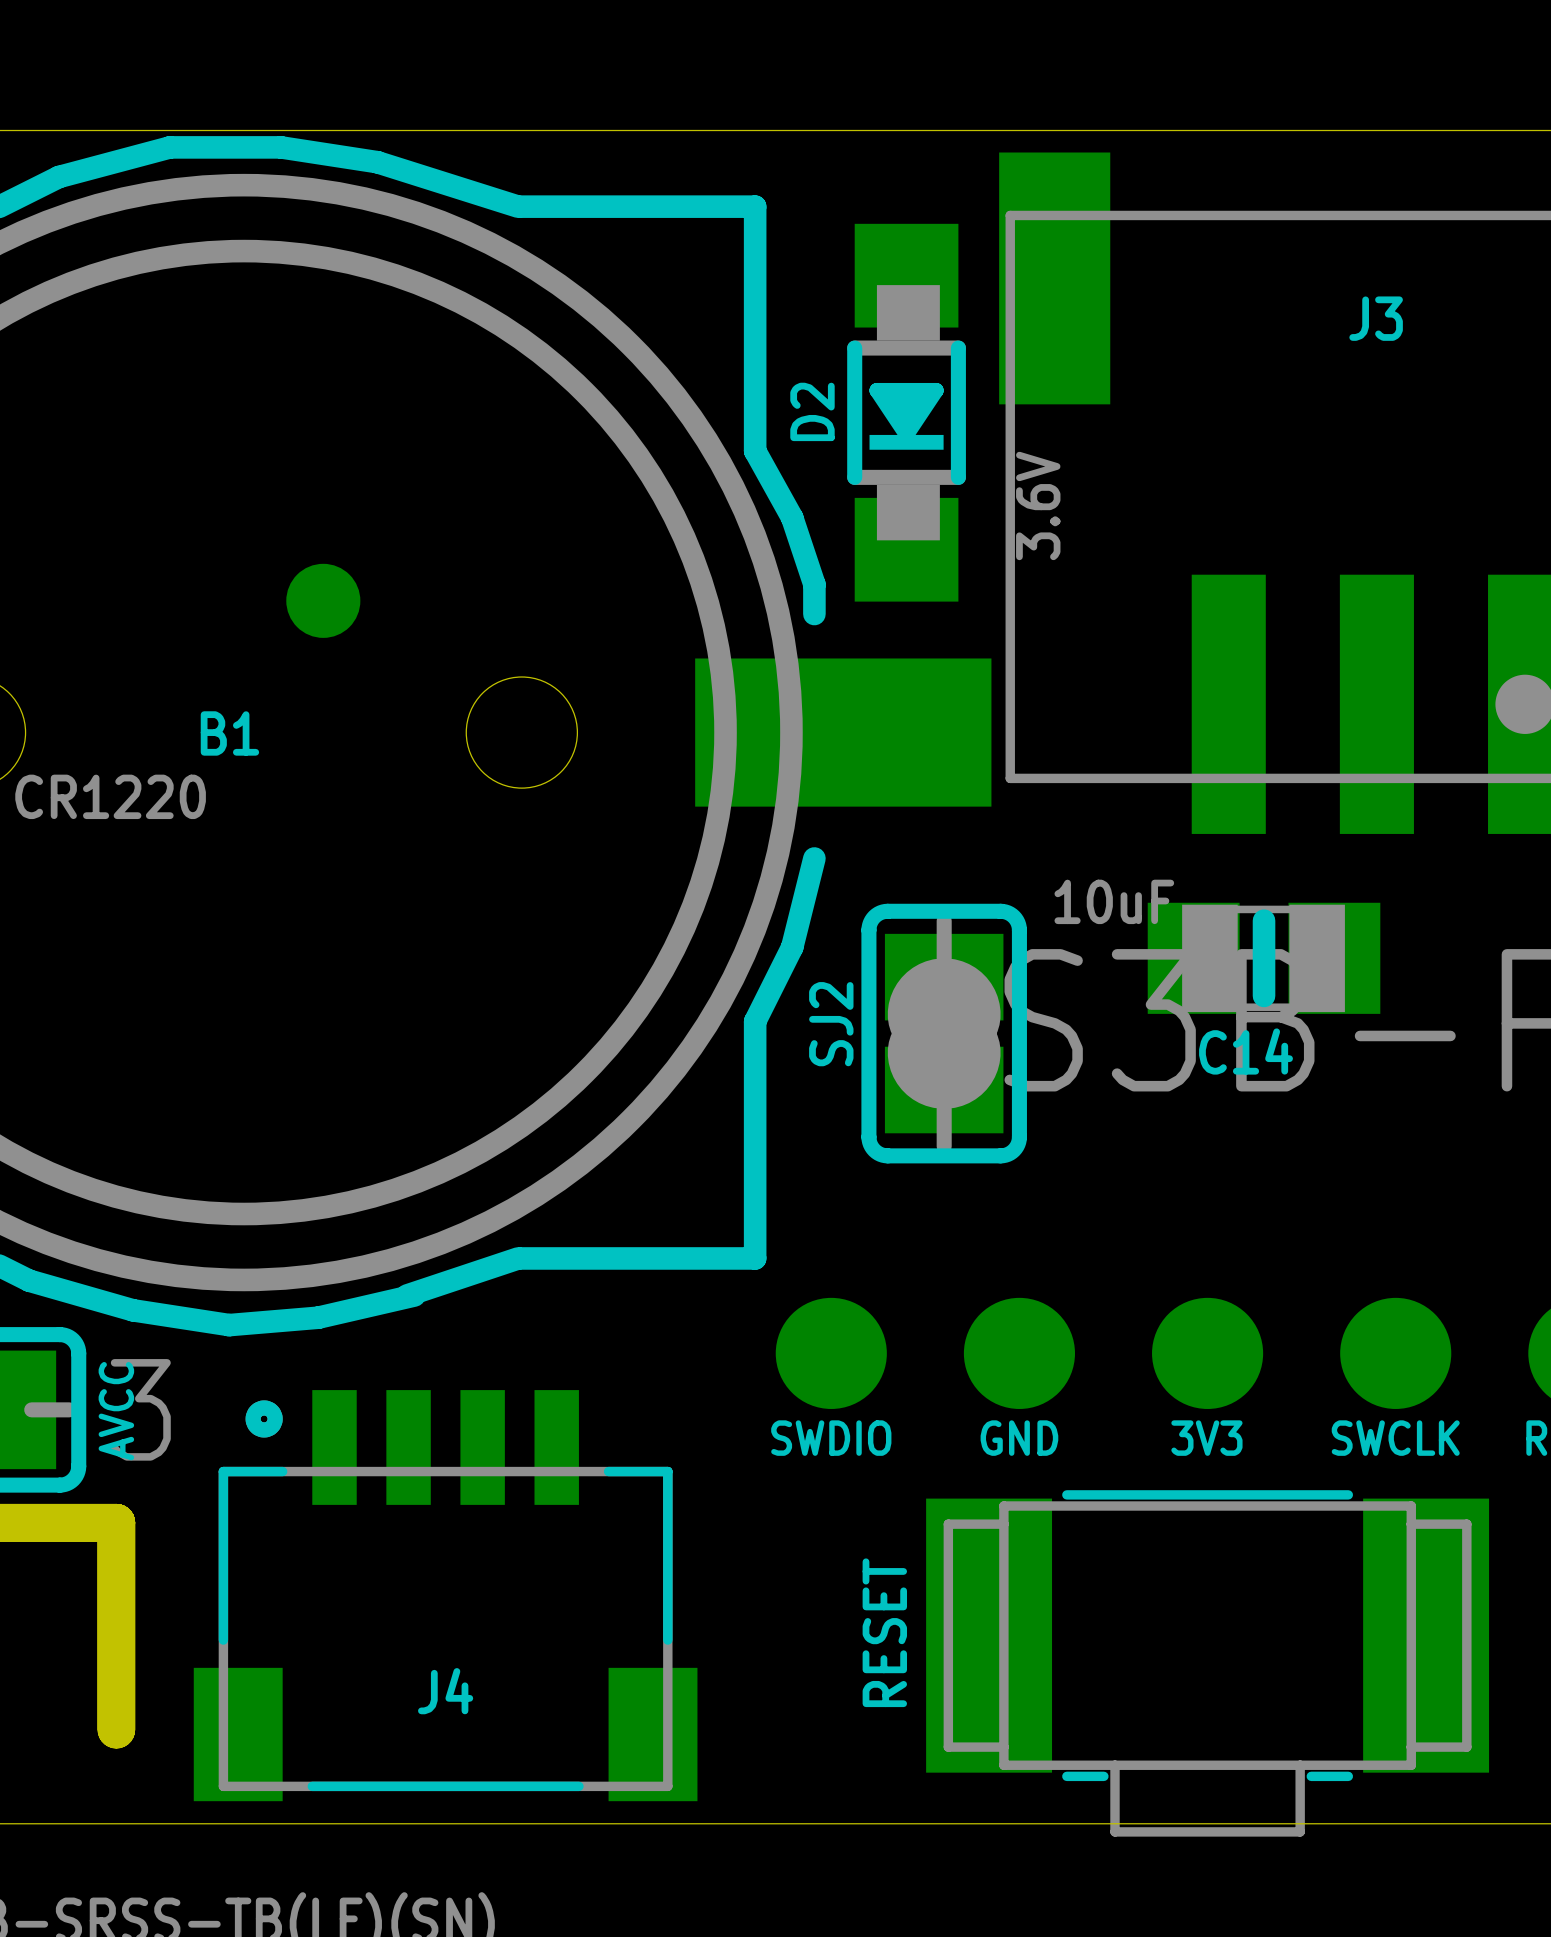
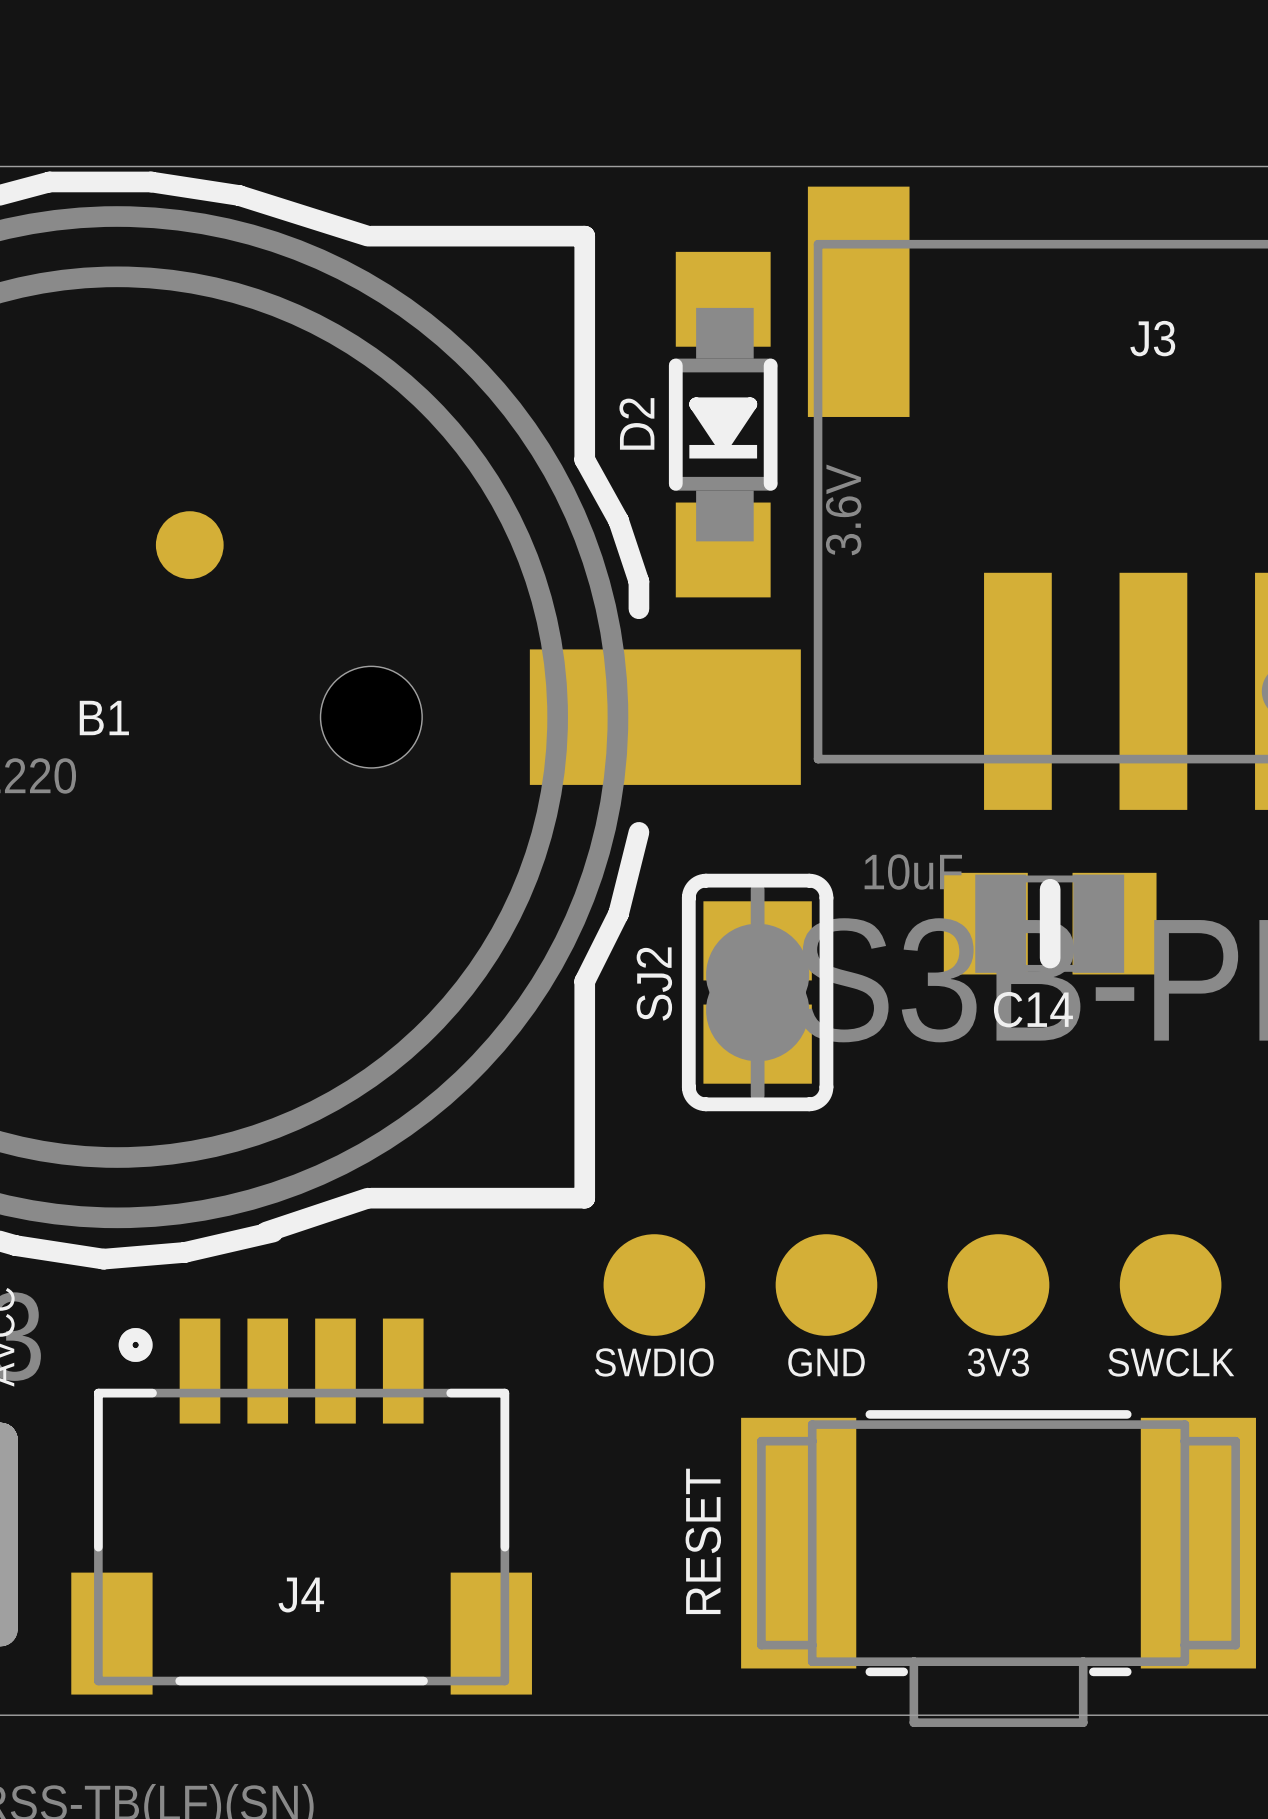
part position: (323, 600) -> (189, 545)

